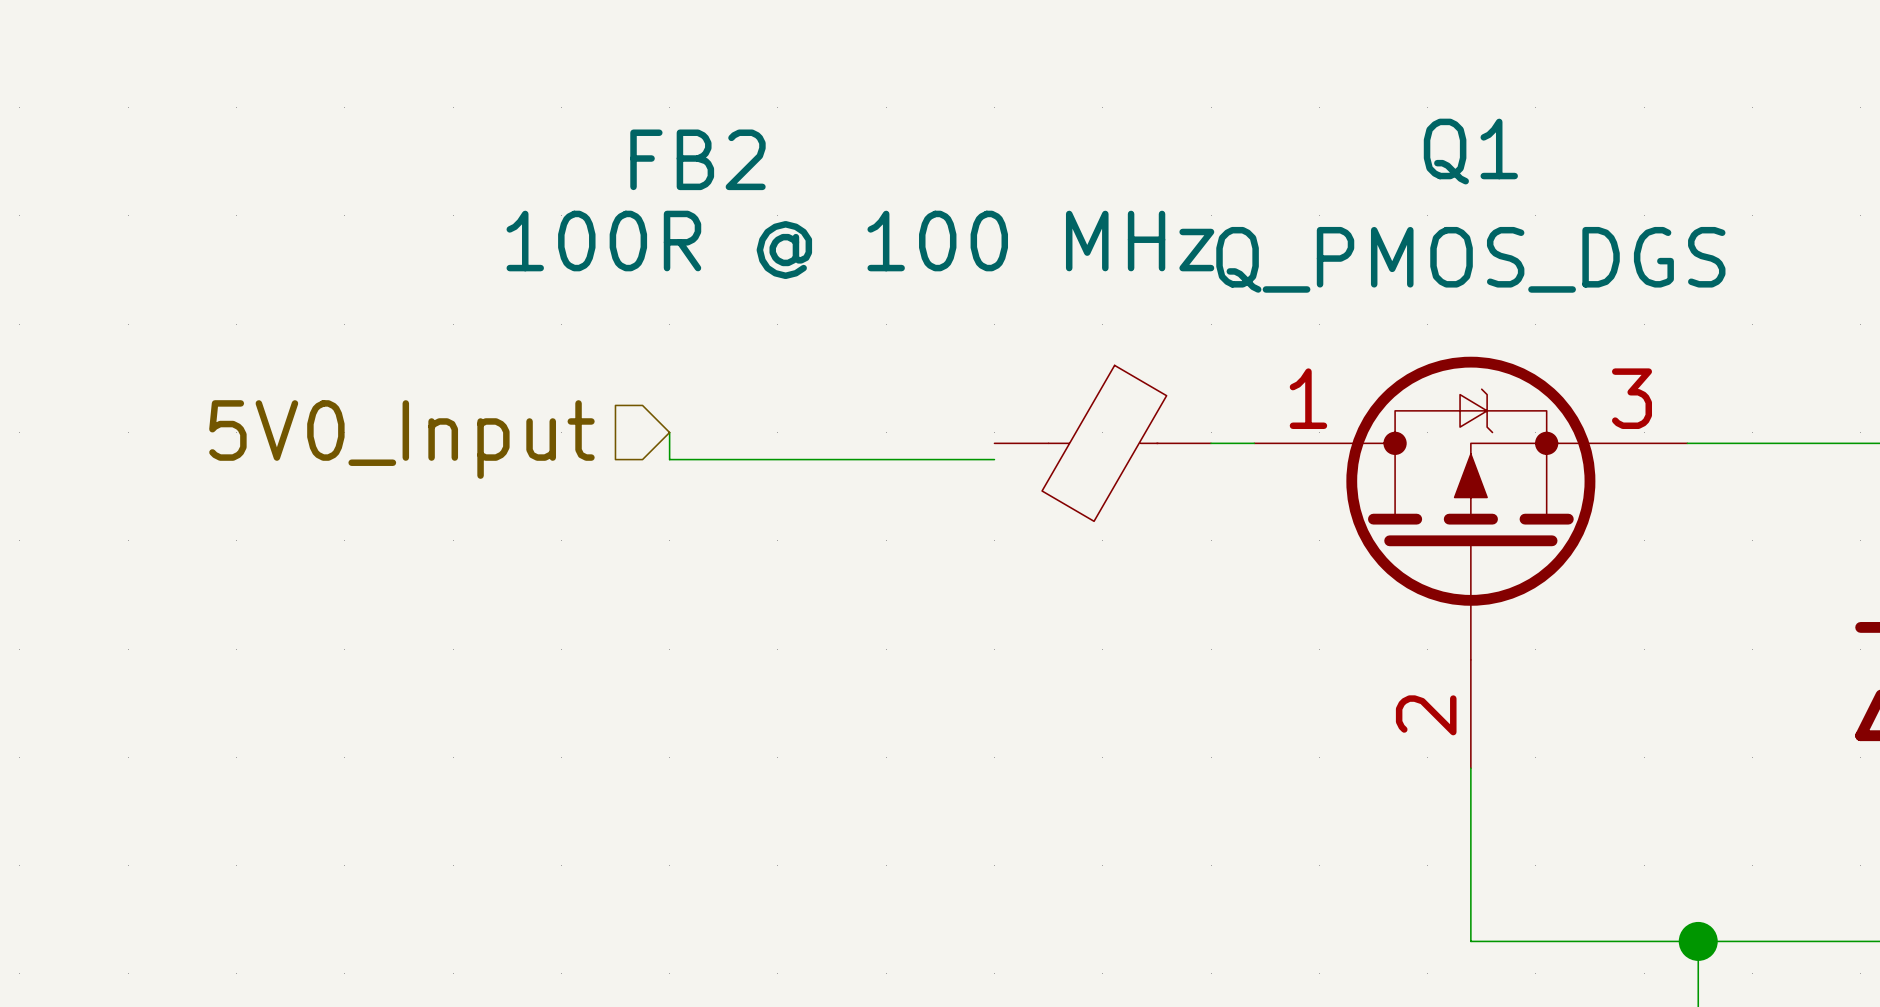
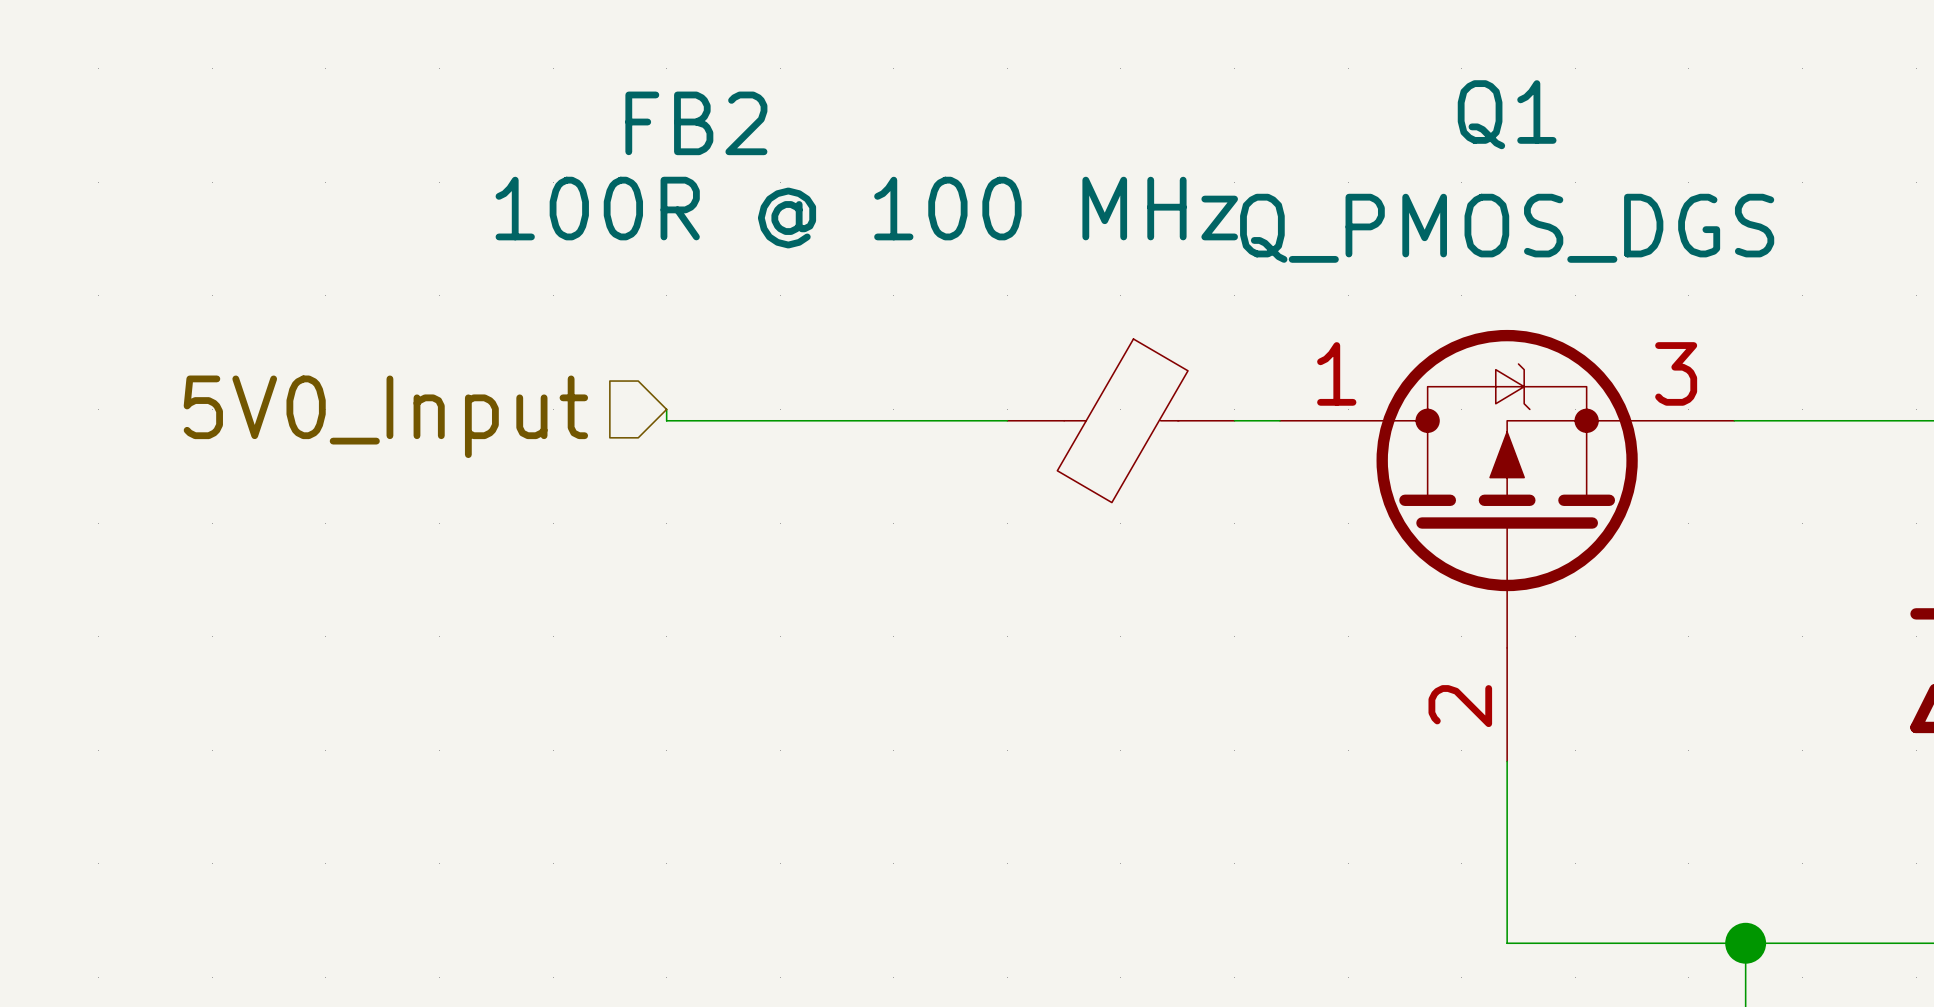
wire: (669, 443) (669, 459) (994, 459) -> (666, 420) (1007, 420)

